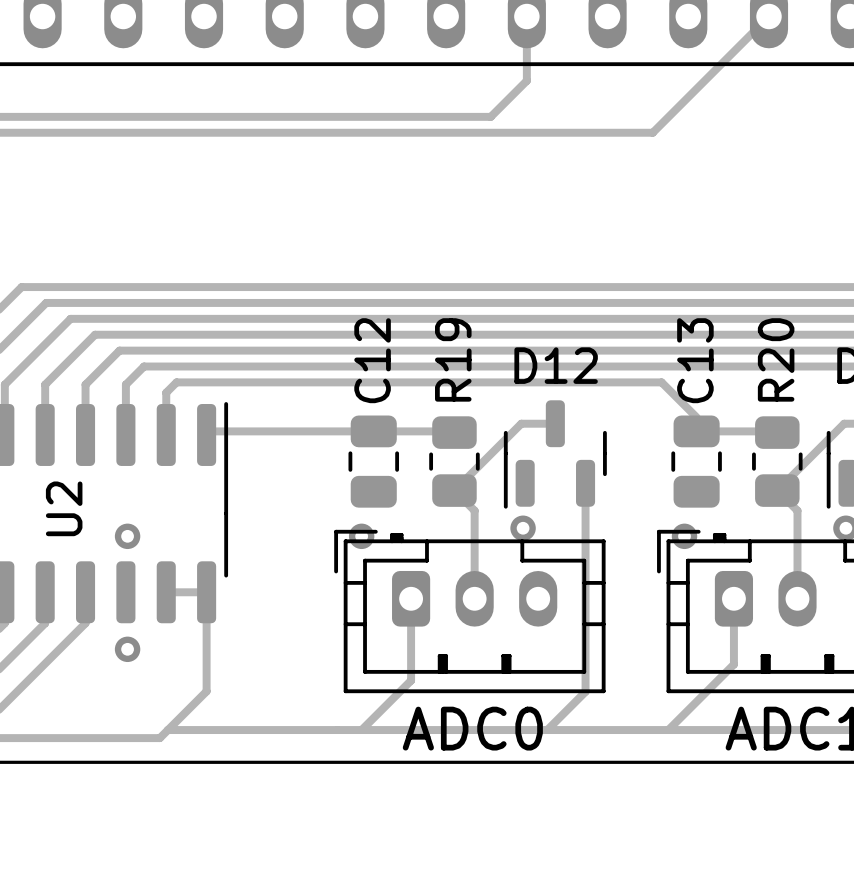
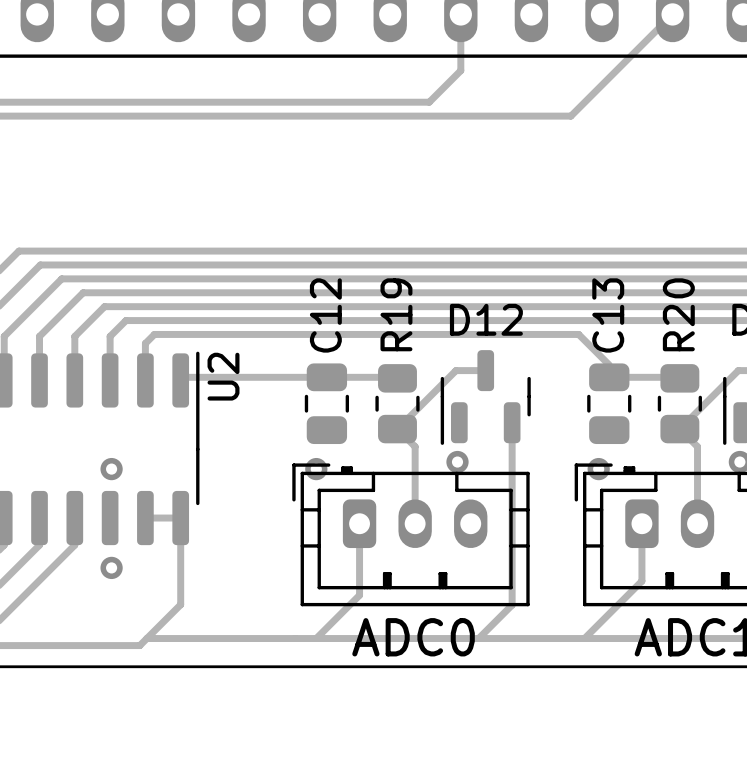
U2 name position: U2 (64, 508) -> U2 (223, 376)

